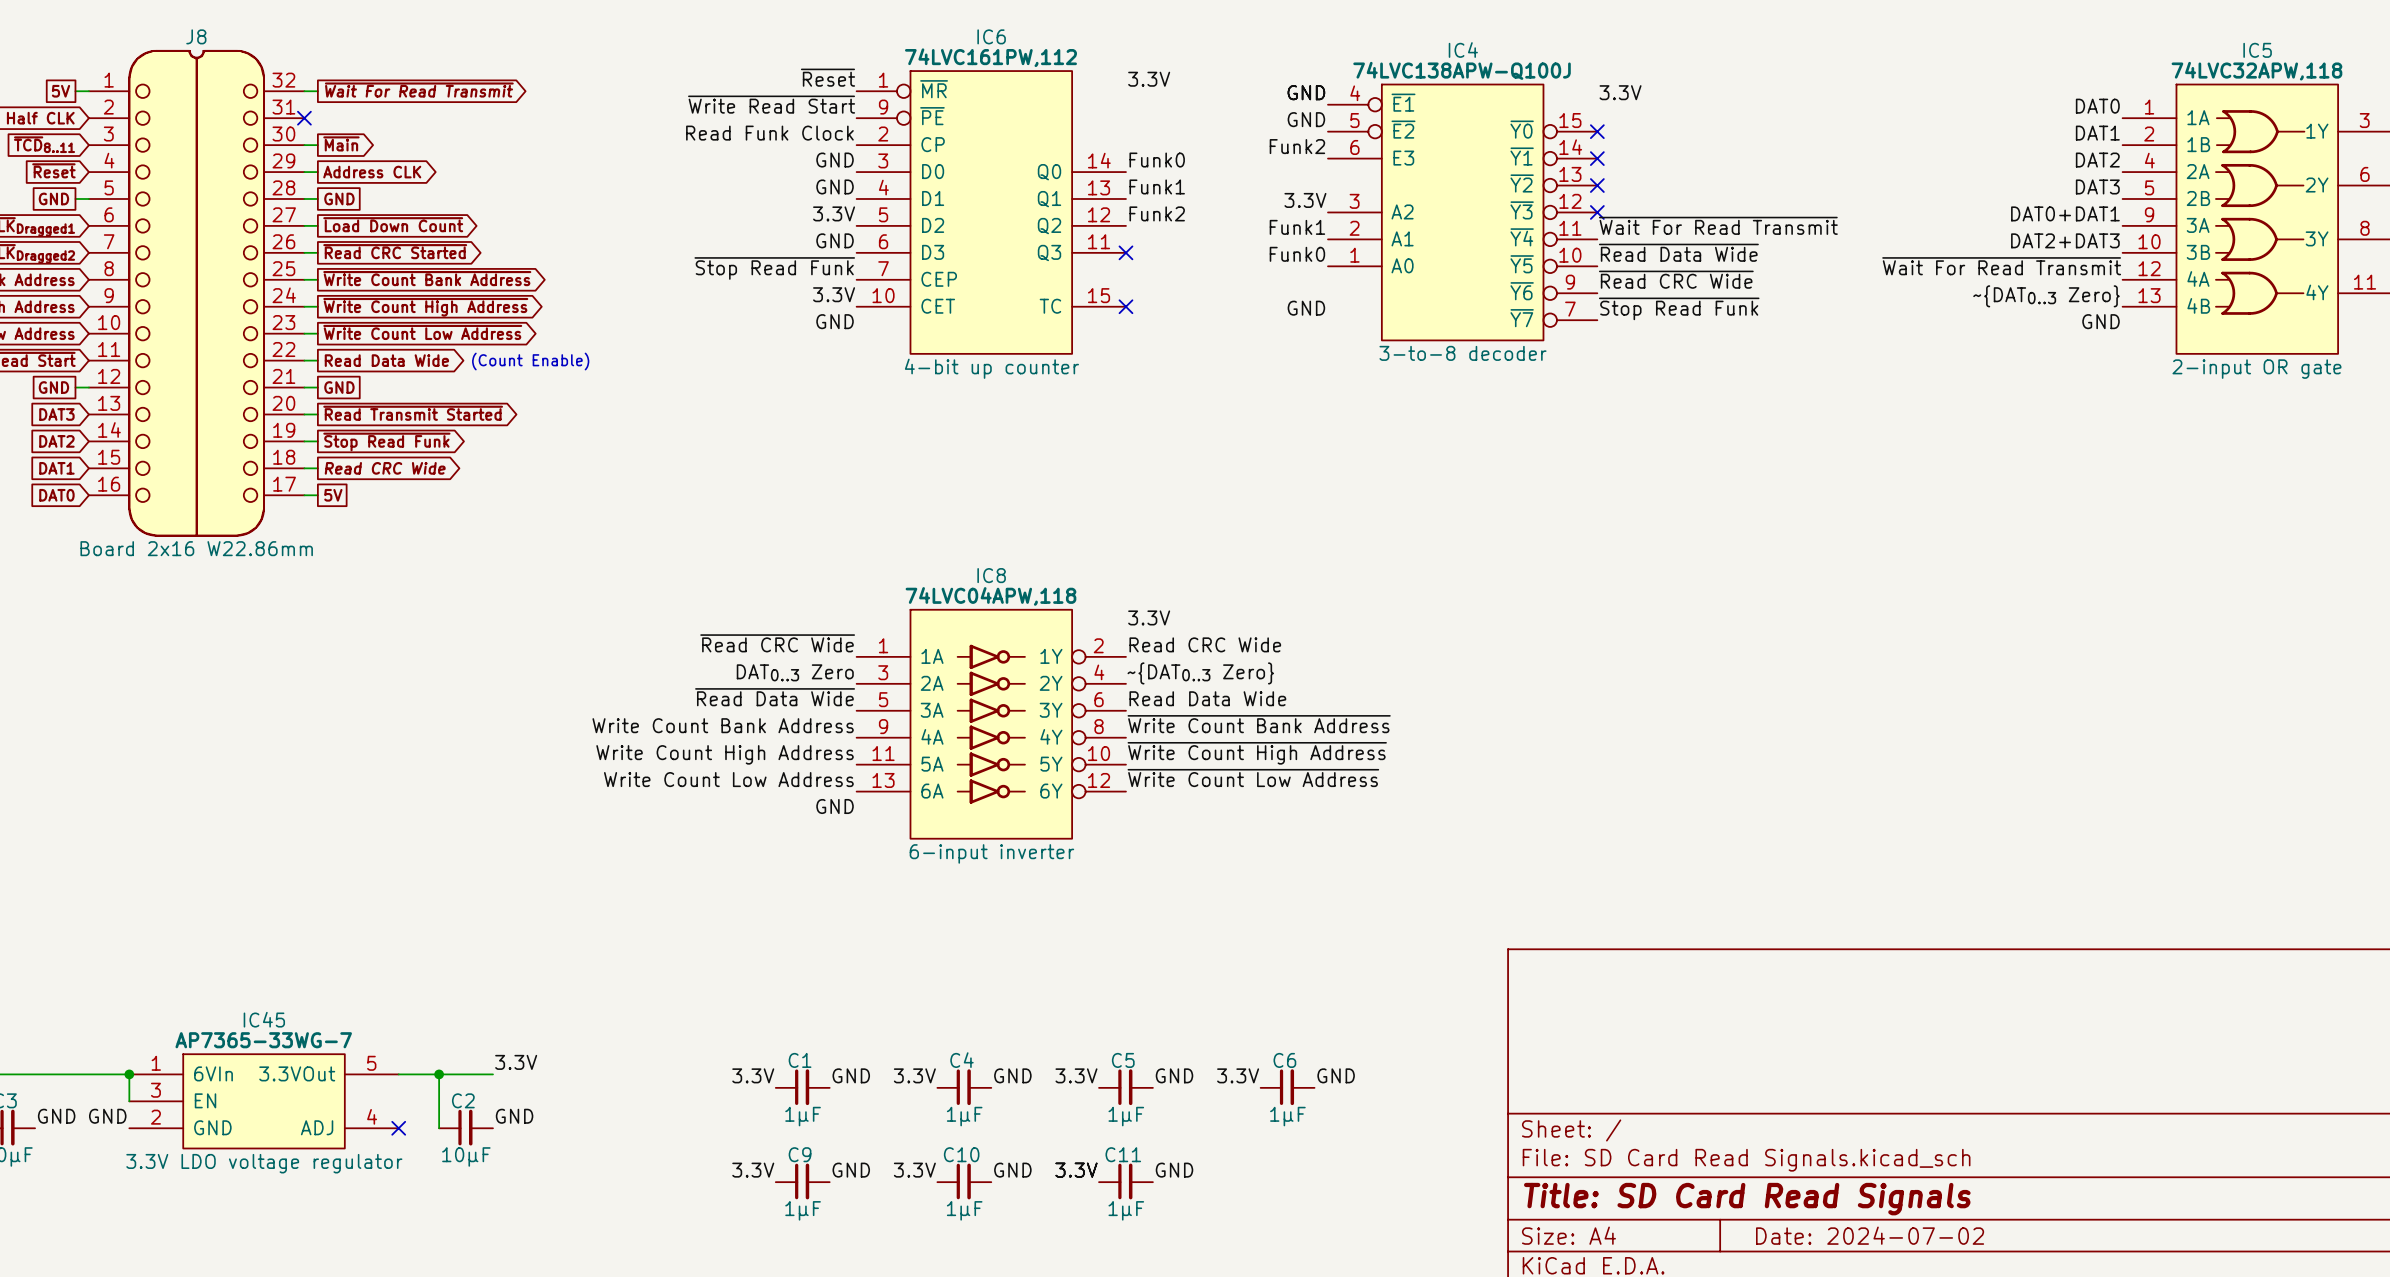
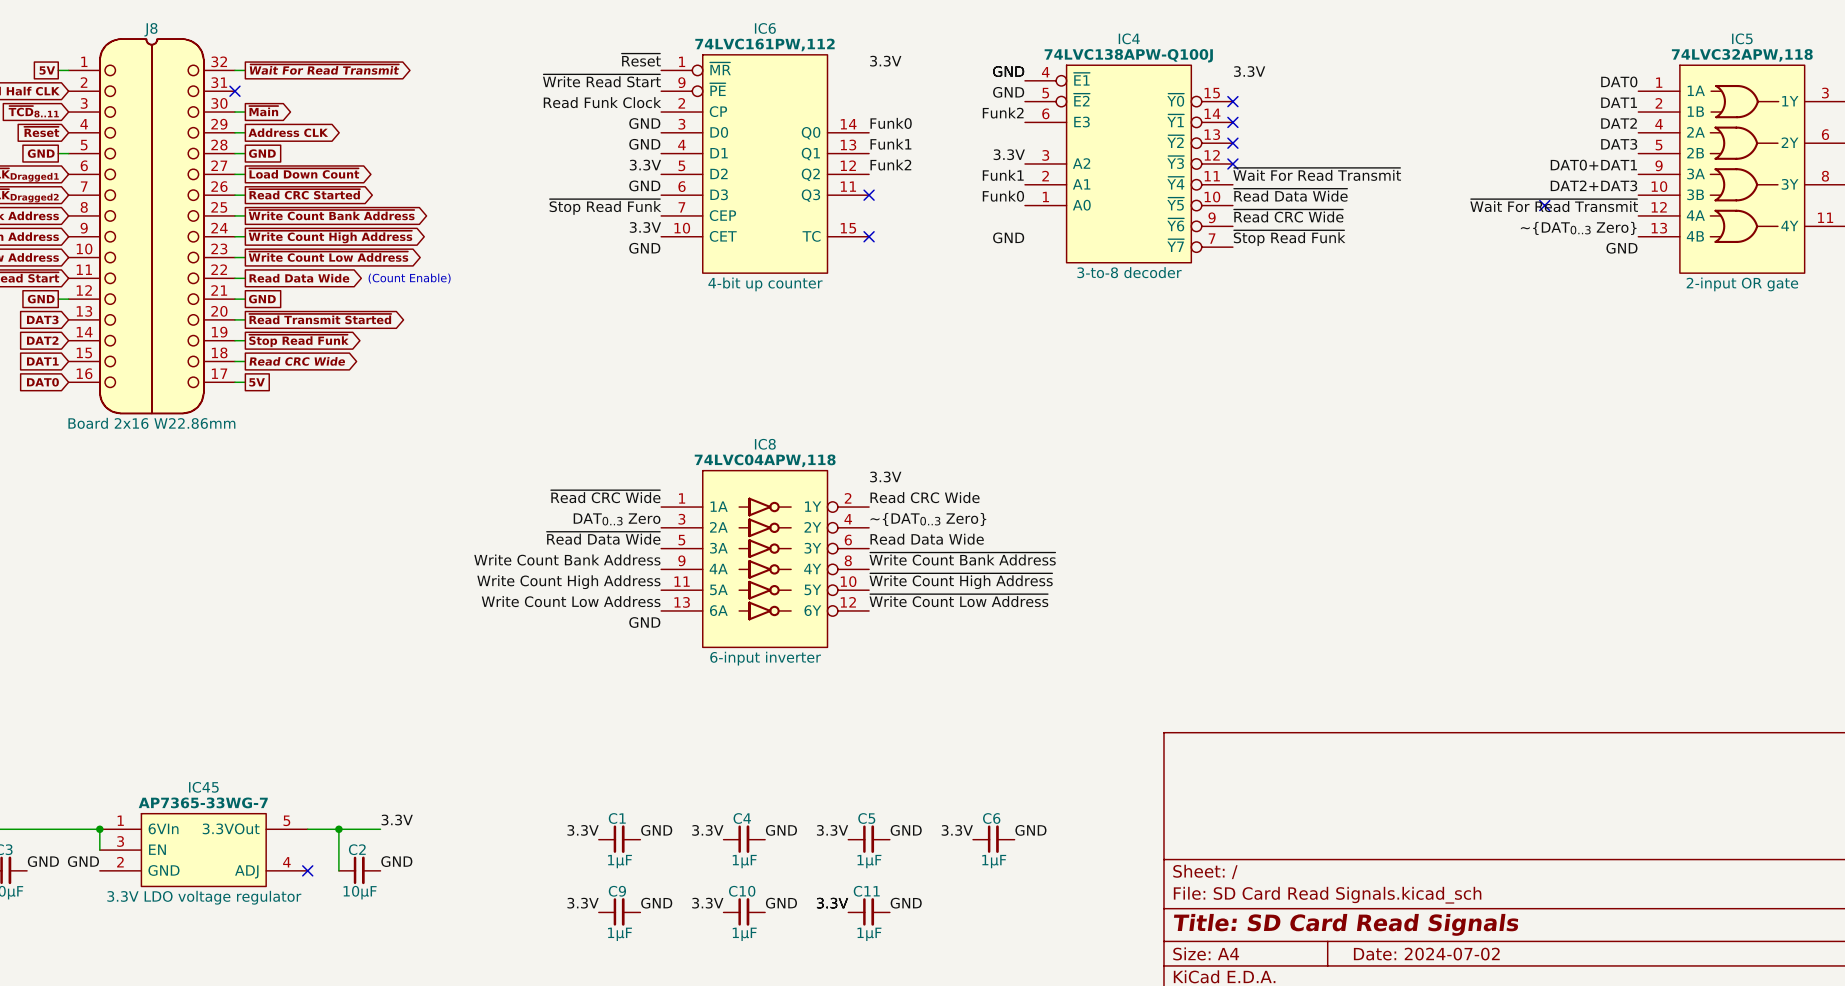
no-connect mark: none -> (1544, 205)

